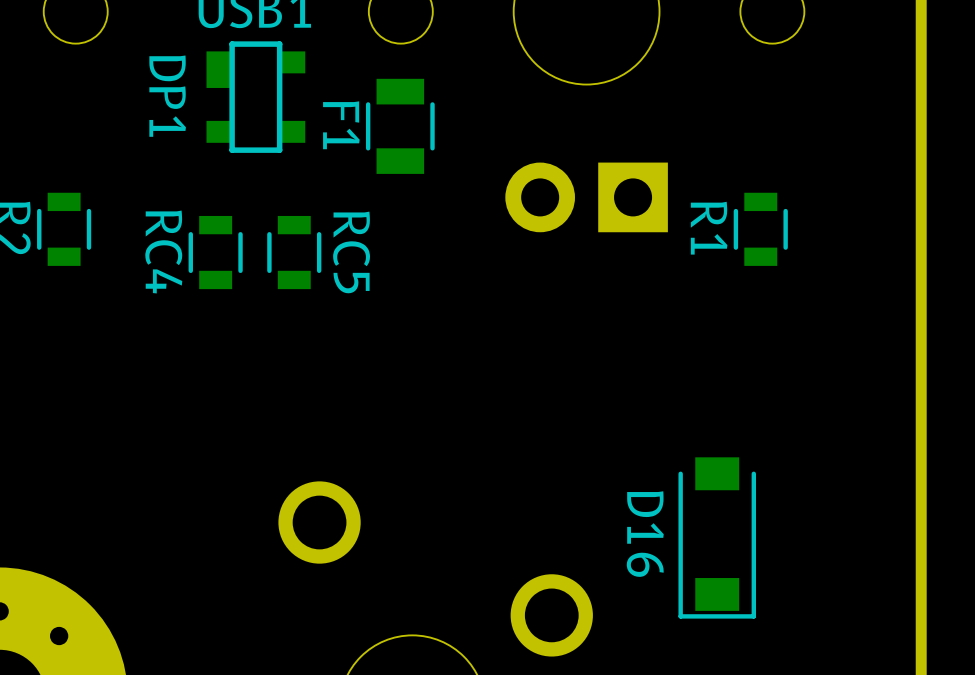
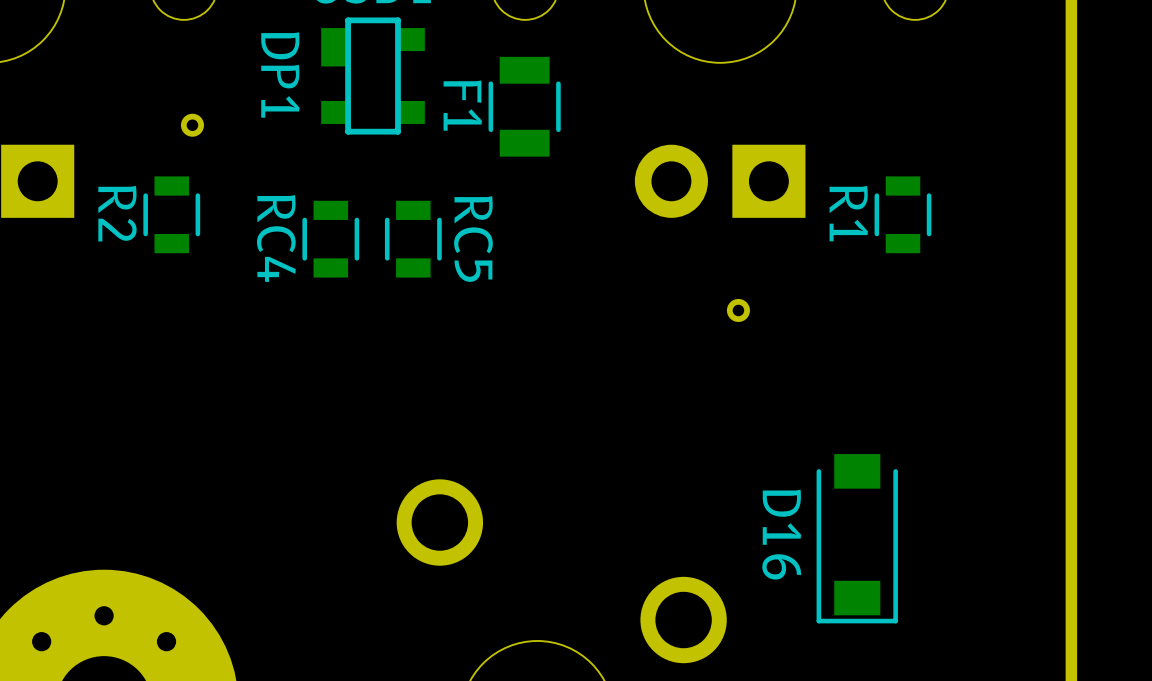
part: none -> (192, 125)
part: none -> (738, 310)

